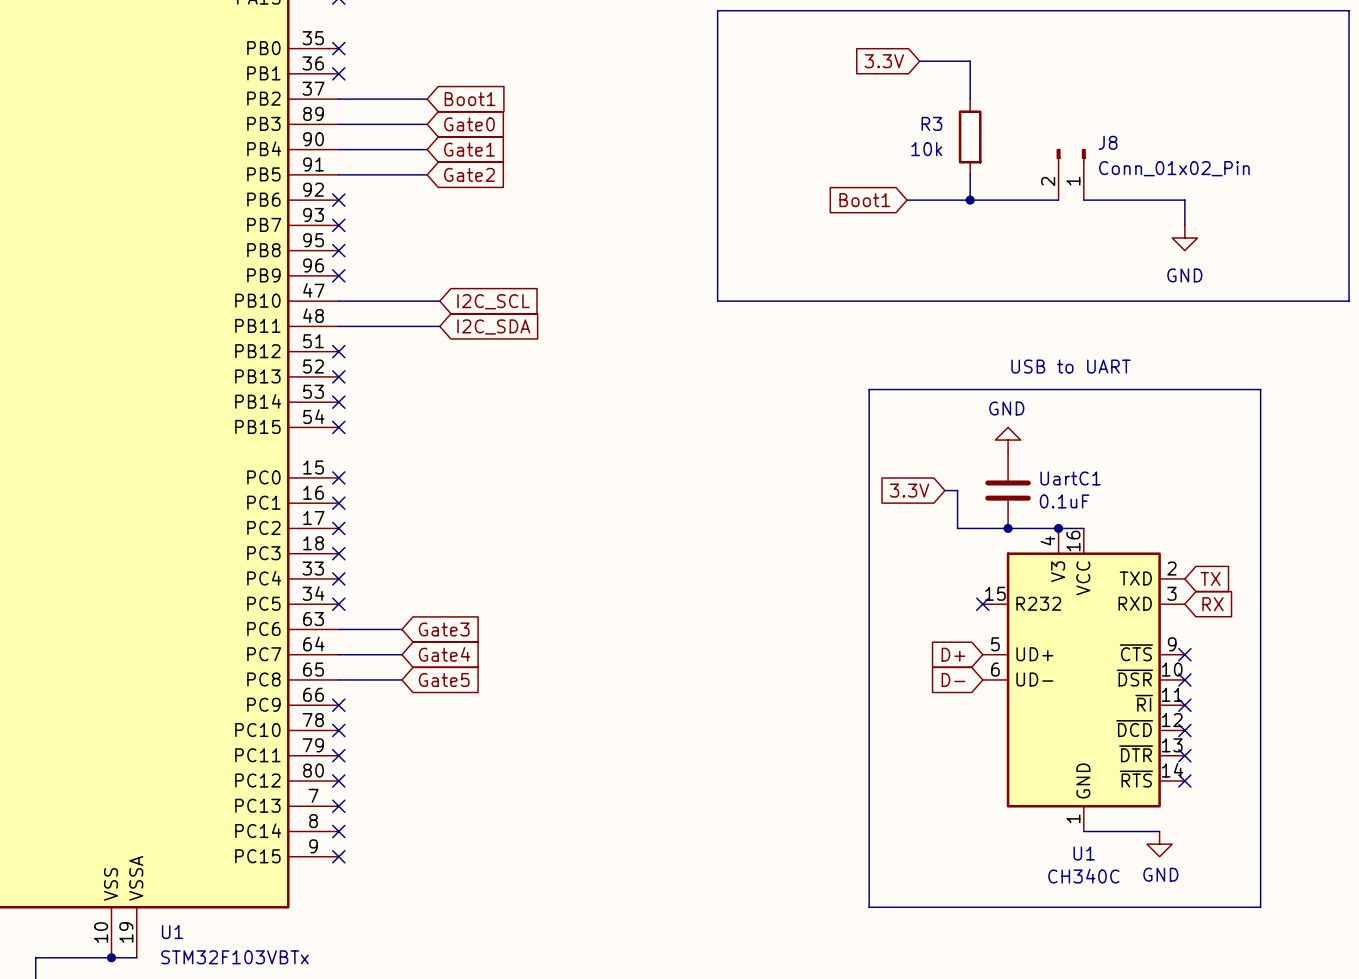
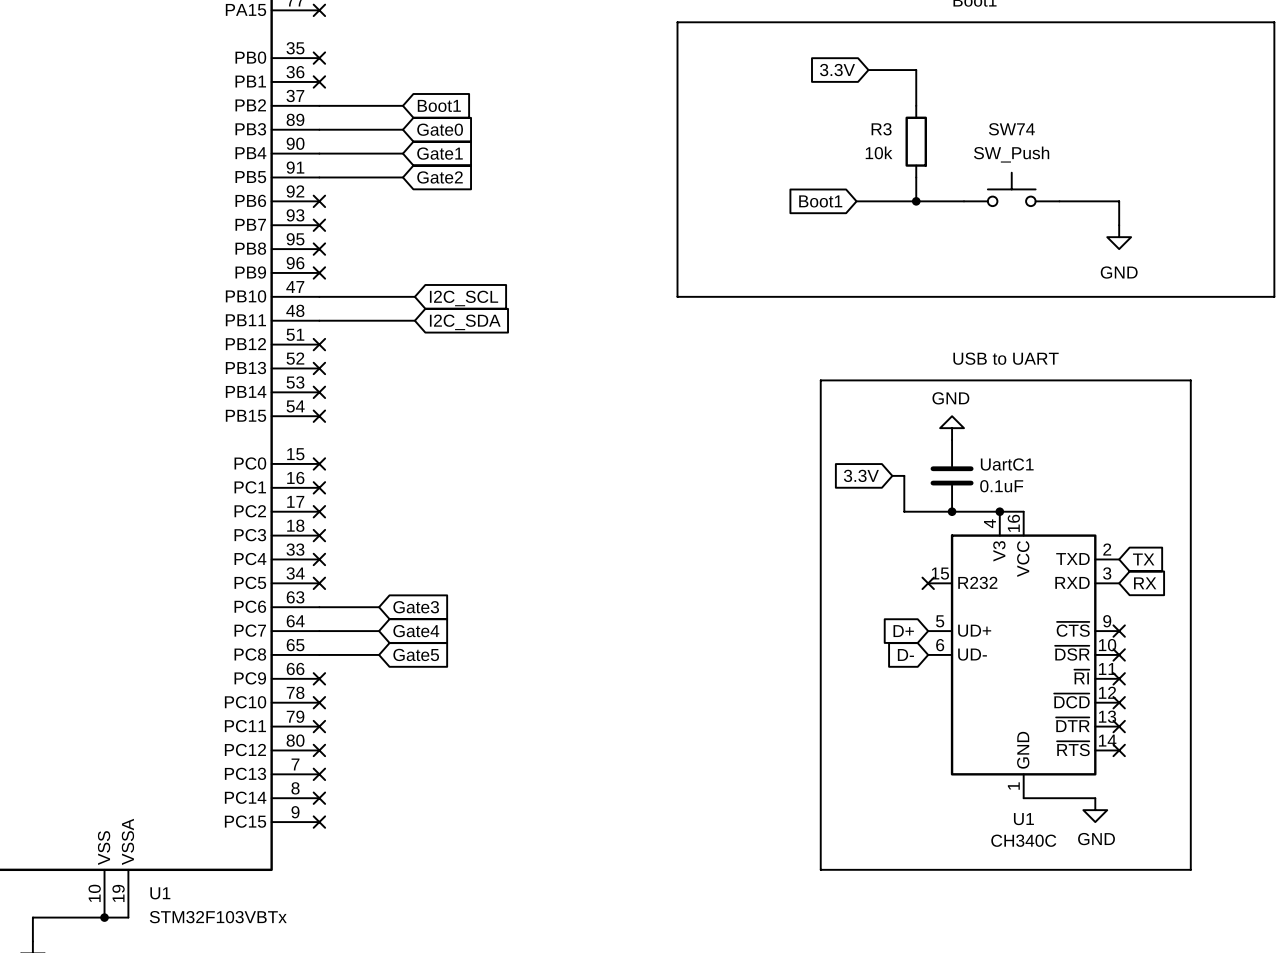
J8: Conn_01x02_Pin (1071, 174) -> none
SW74: none -> SW_Push (1011, 189)

